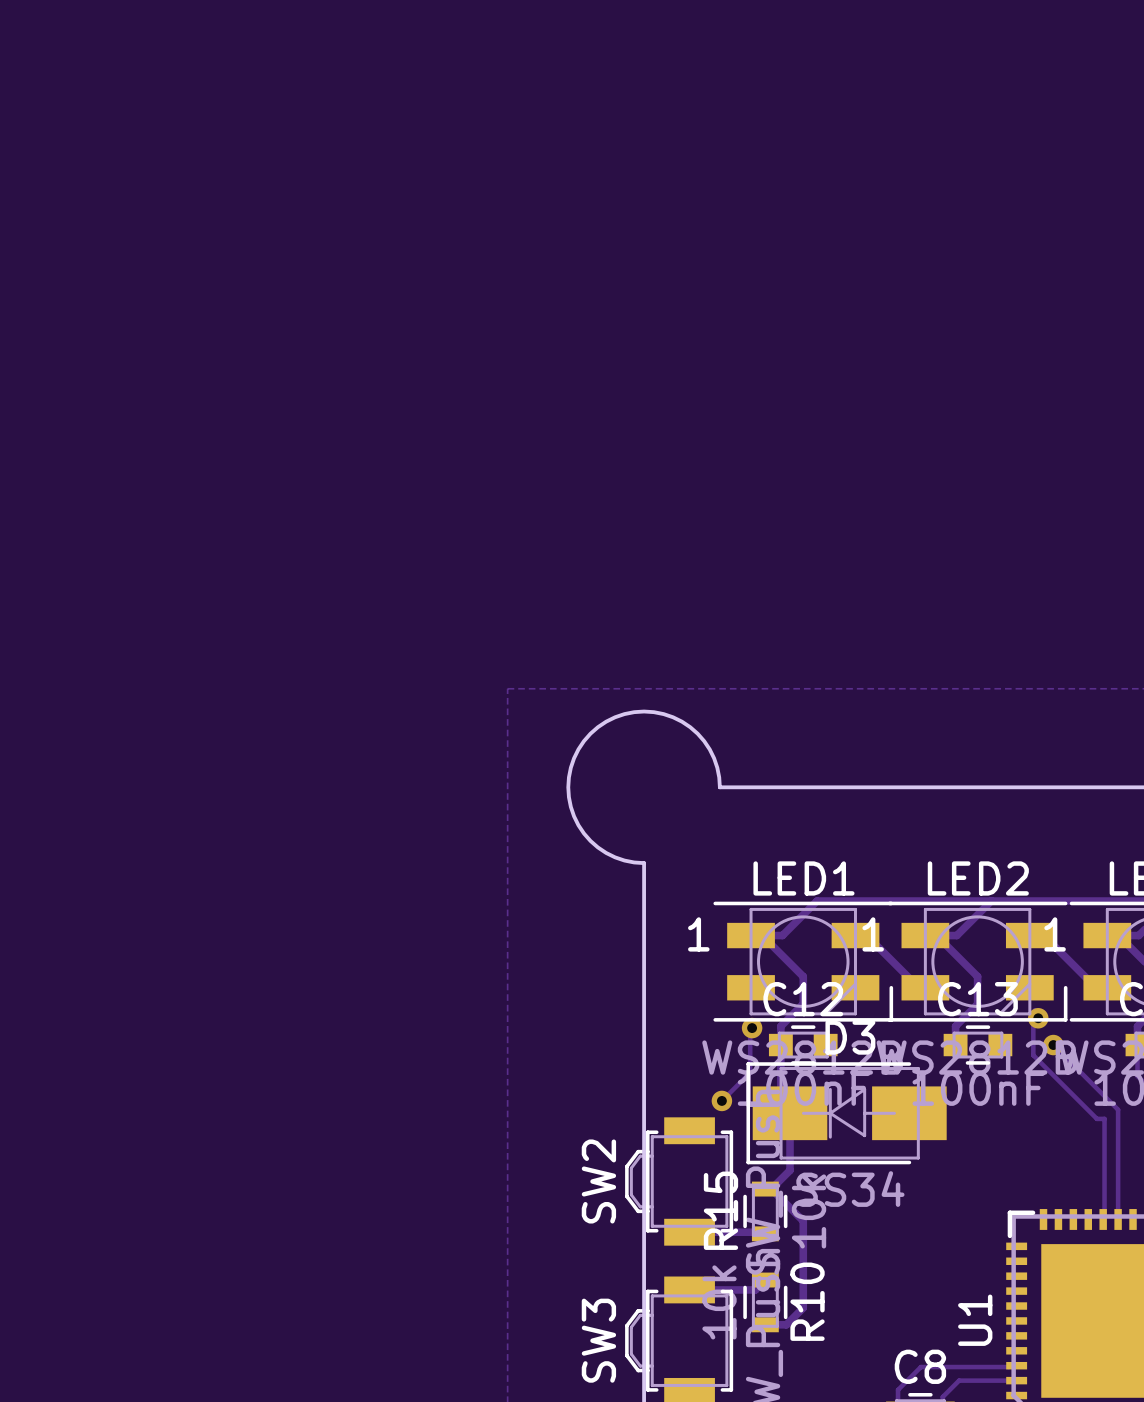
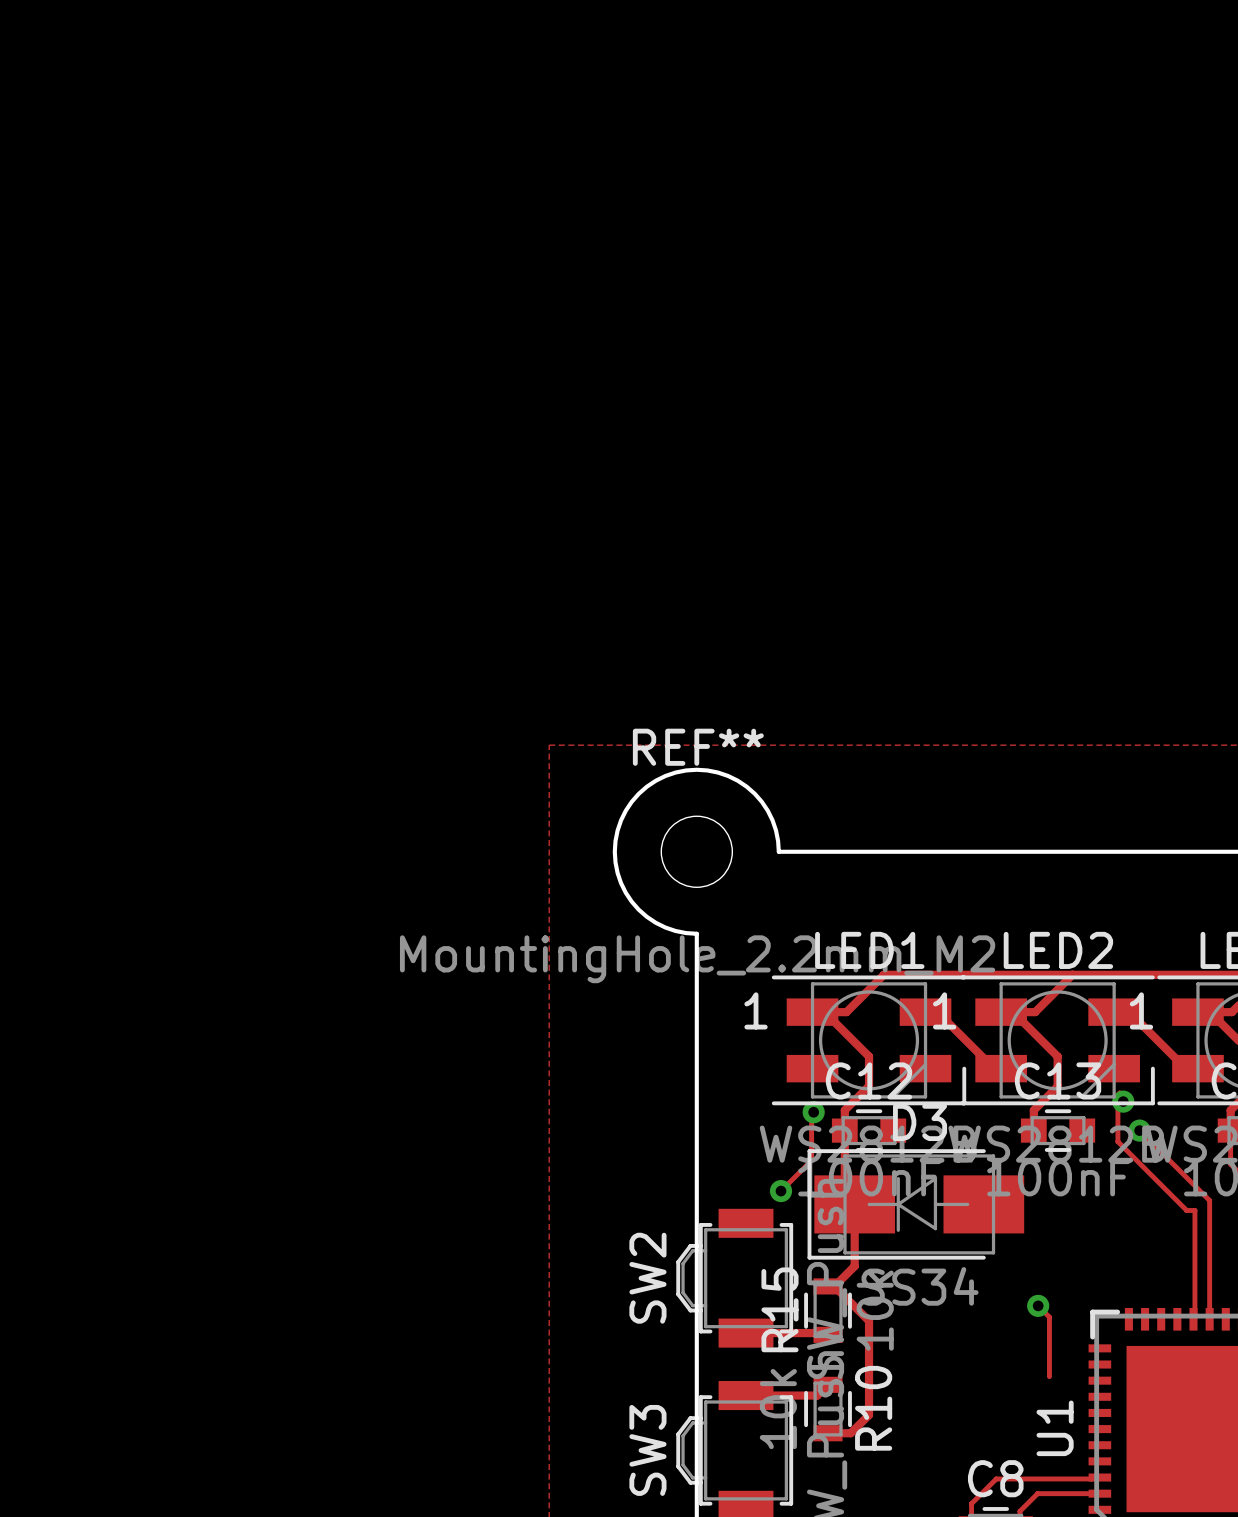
REF**: none -> MountingHole_2.2mm_M2 (696, 851)
track: none -> (1038, 1305) (1049, 1317) (1049, 1376)
via: none -> (1038, 1305)

